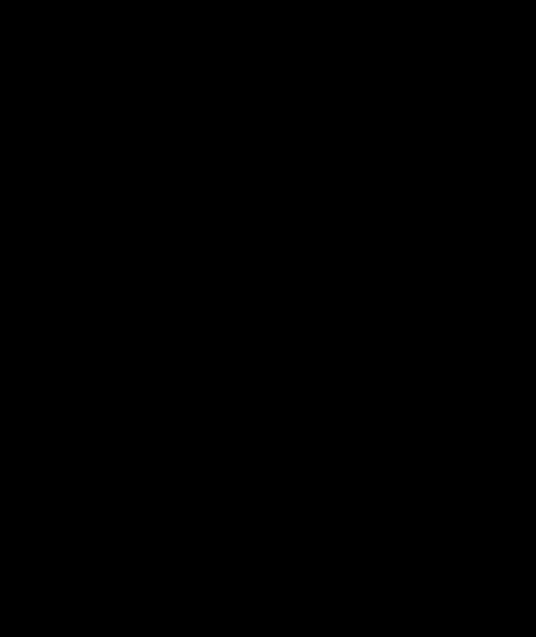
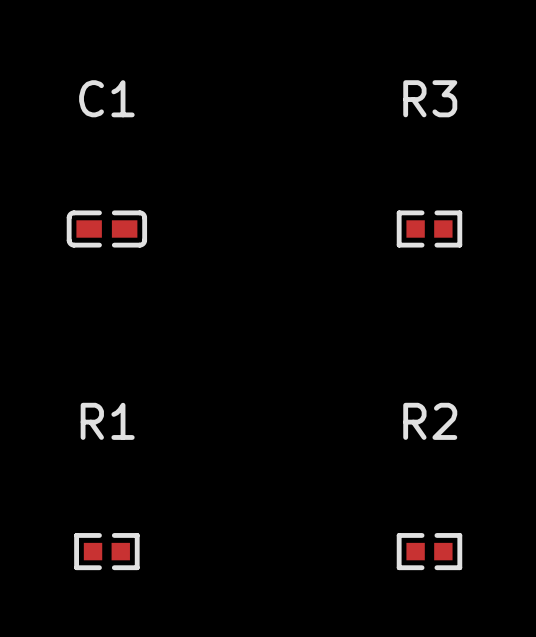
C1: none -> (106, 228)
R3: none -> (429, 228)
R1: none -> (106, 551)
R2: none -> (429, 551)

